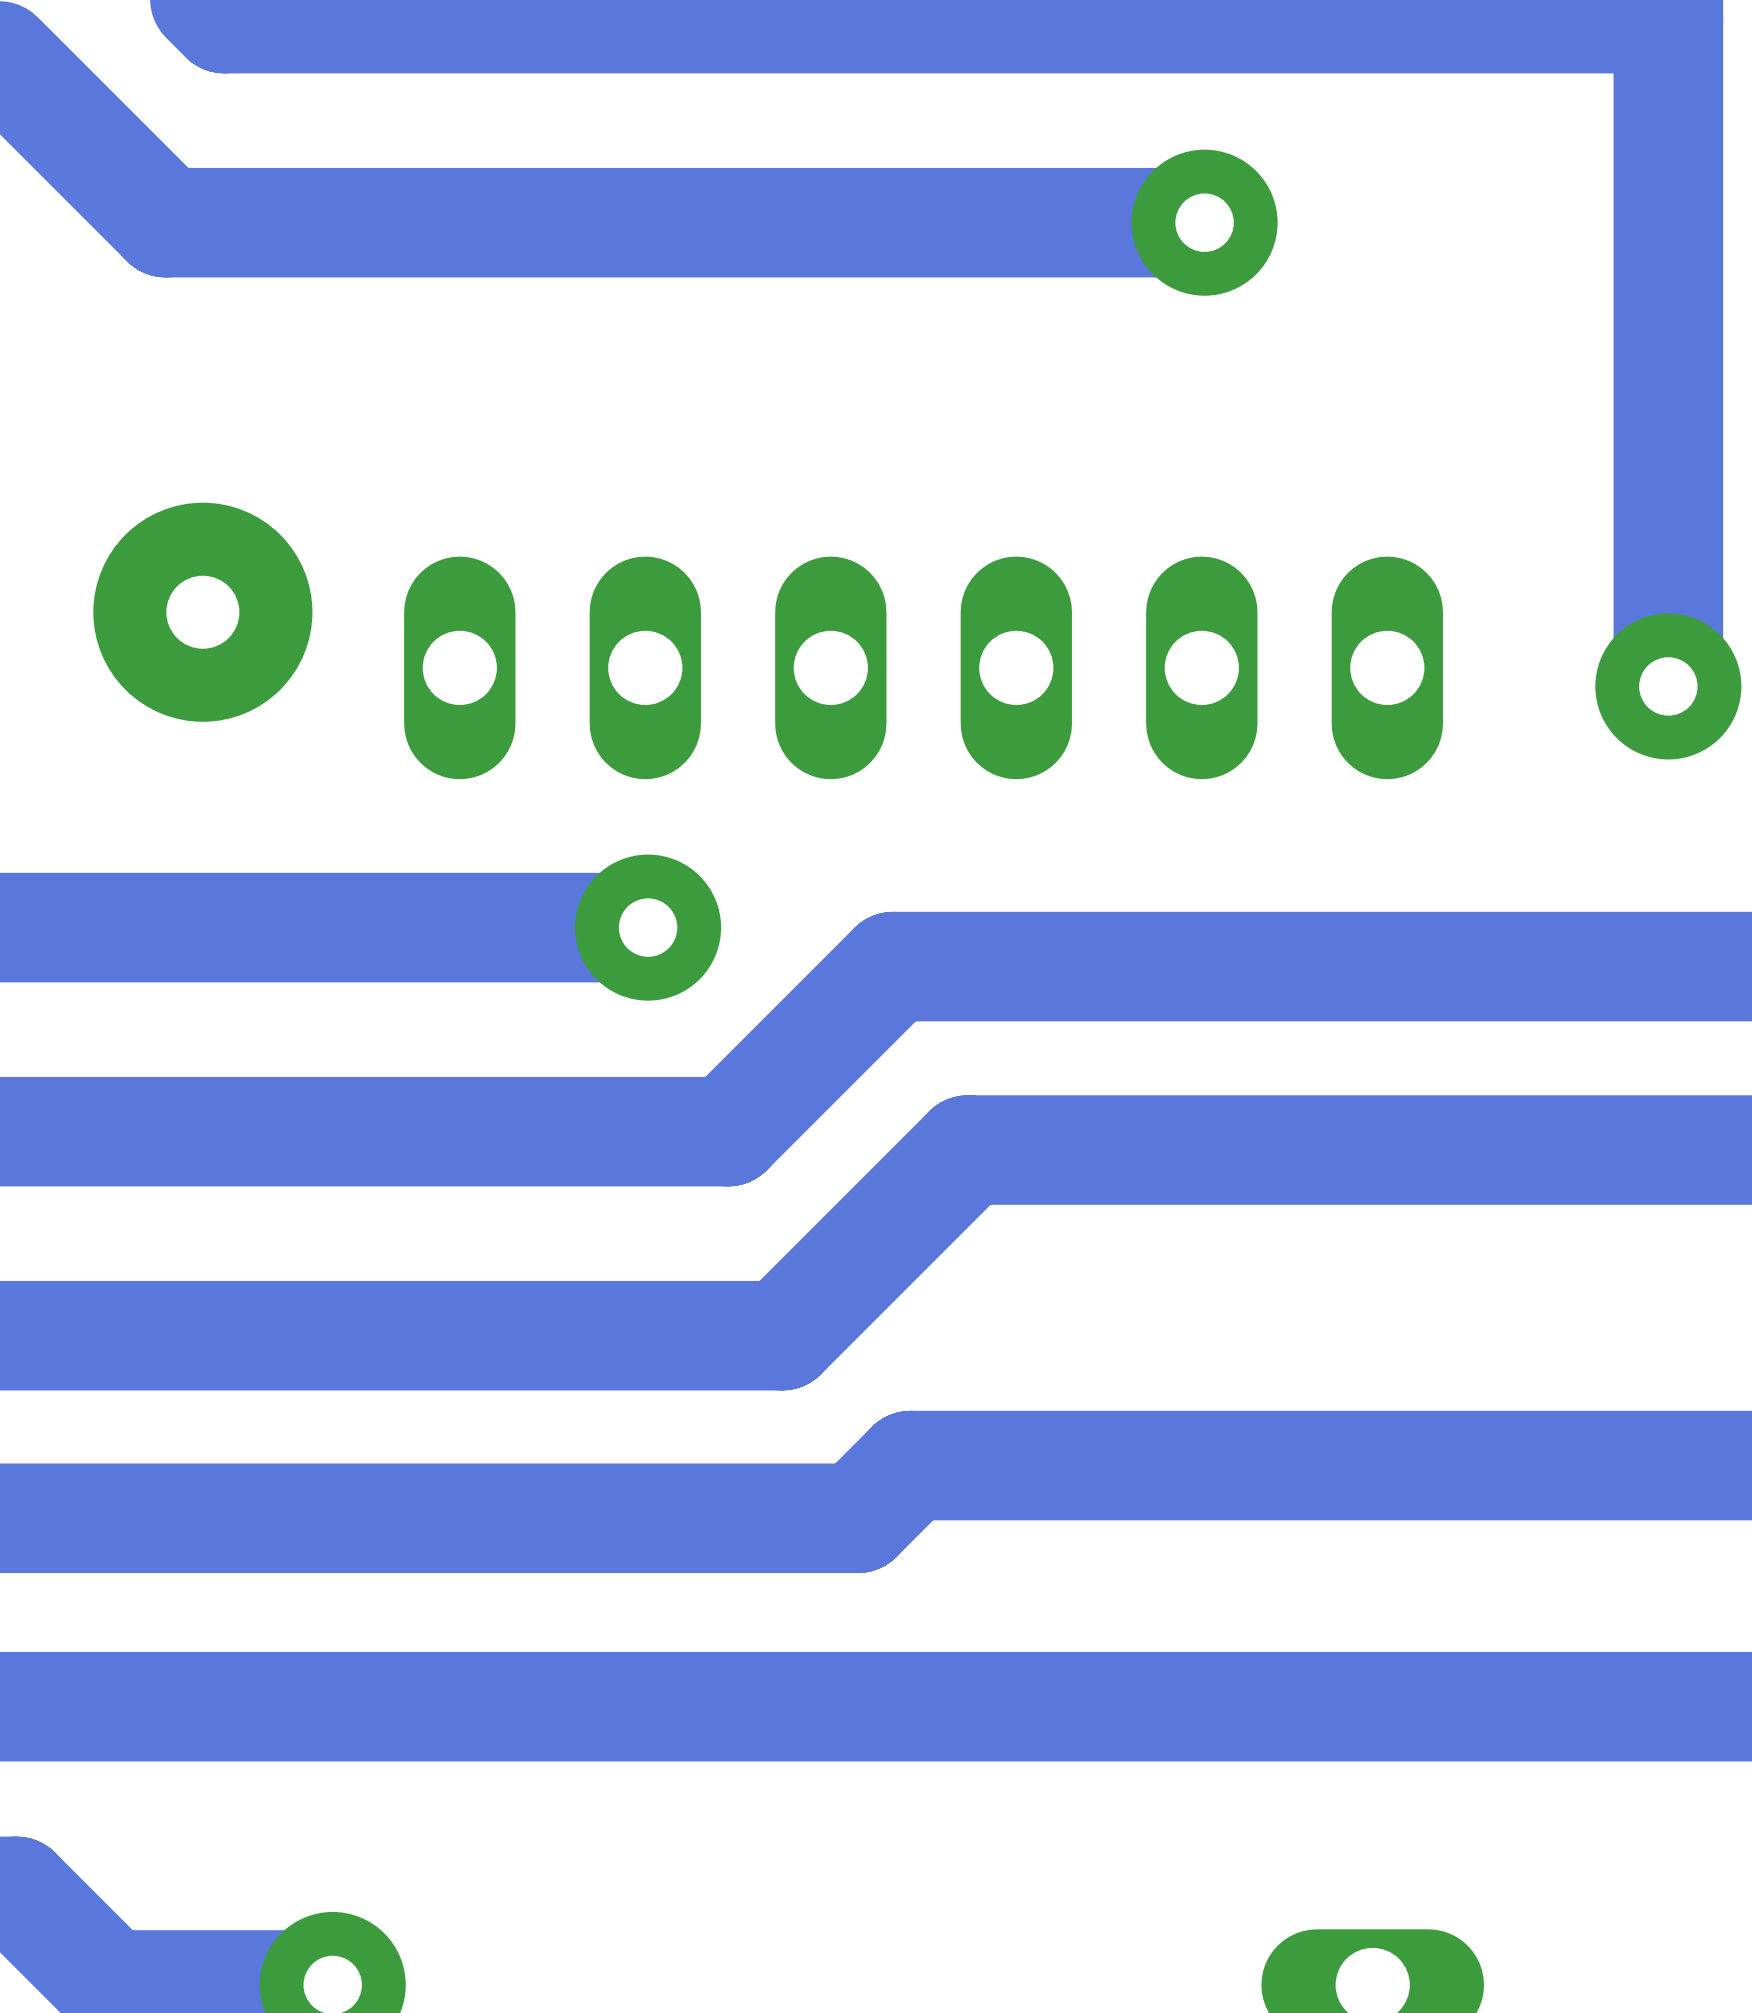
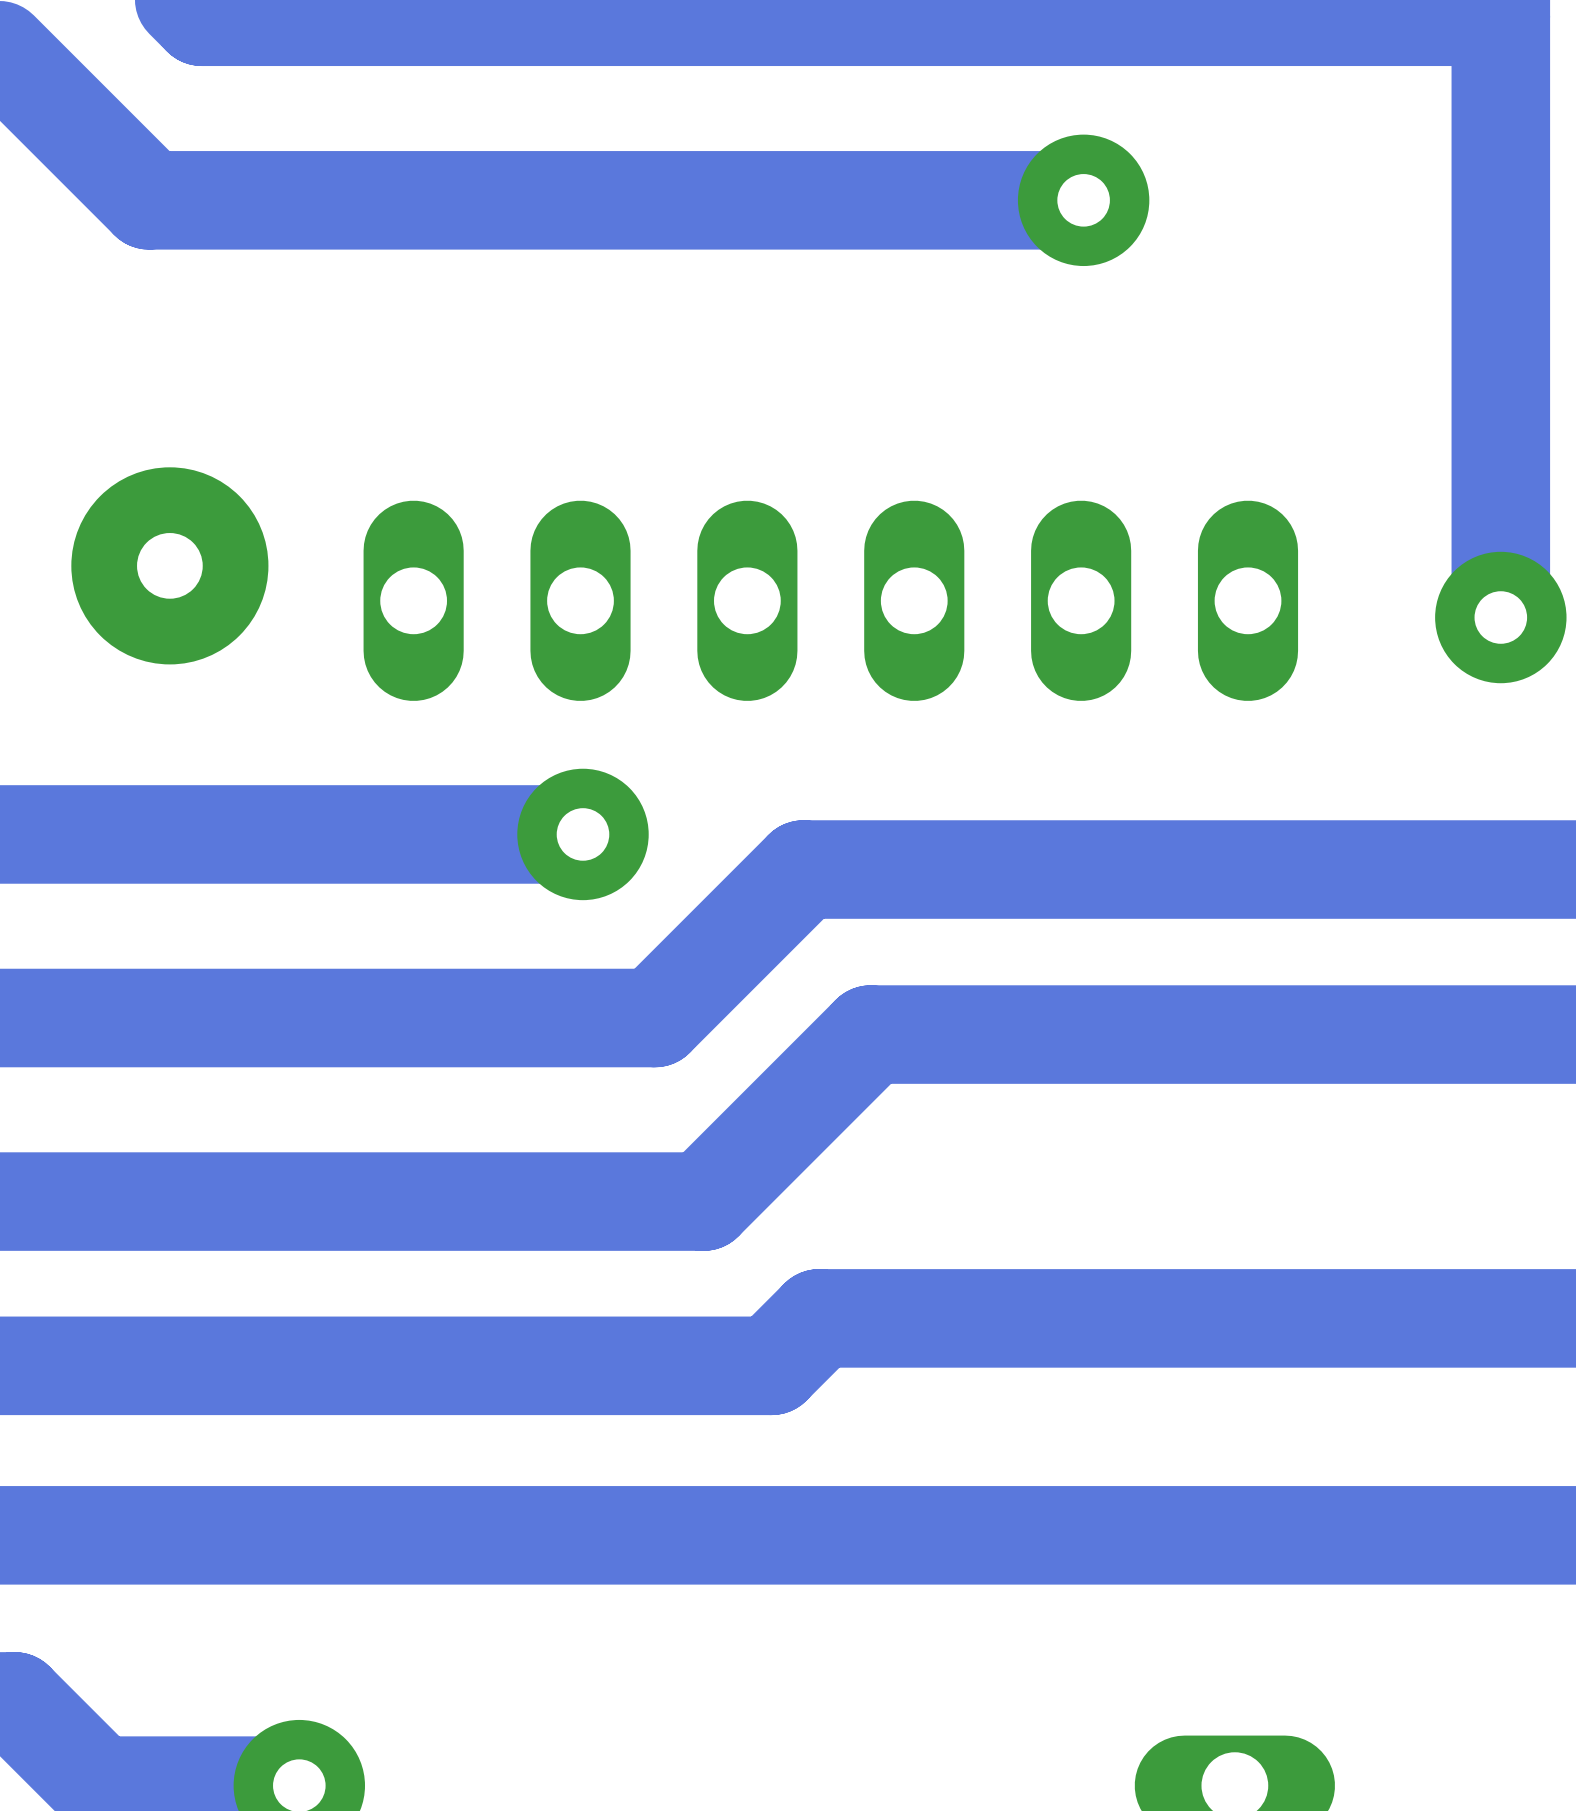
via position: (202, 612) -> (169, 565)

